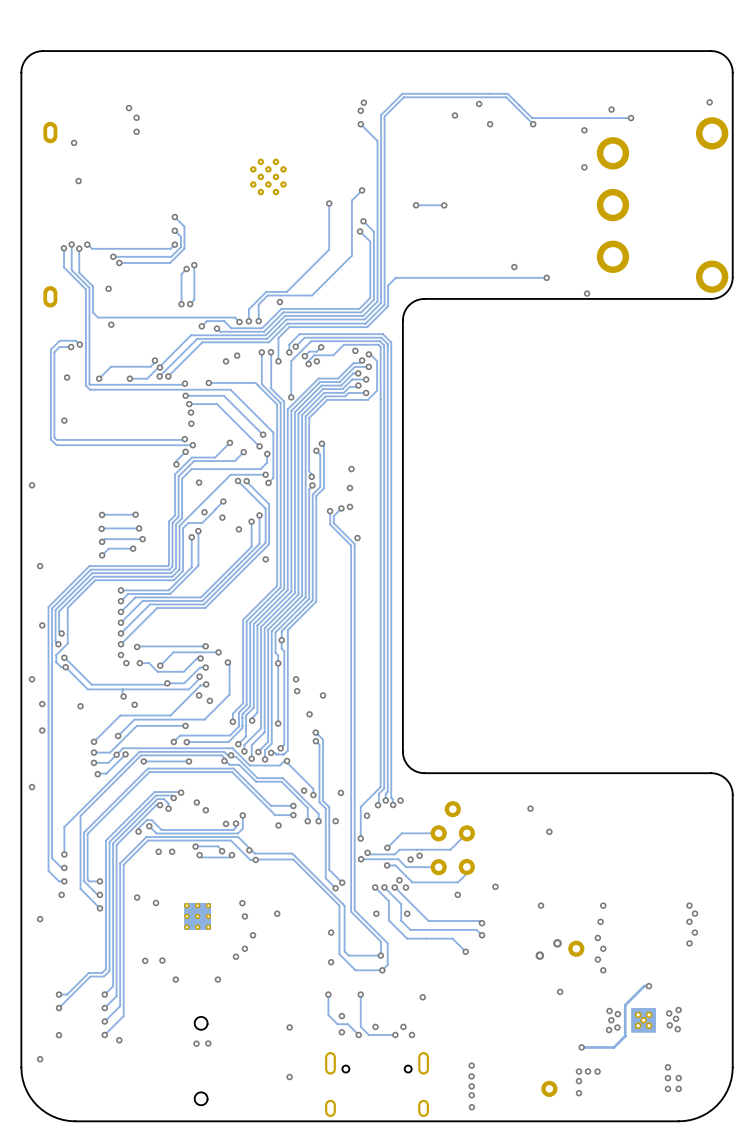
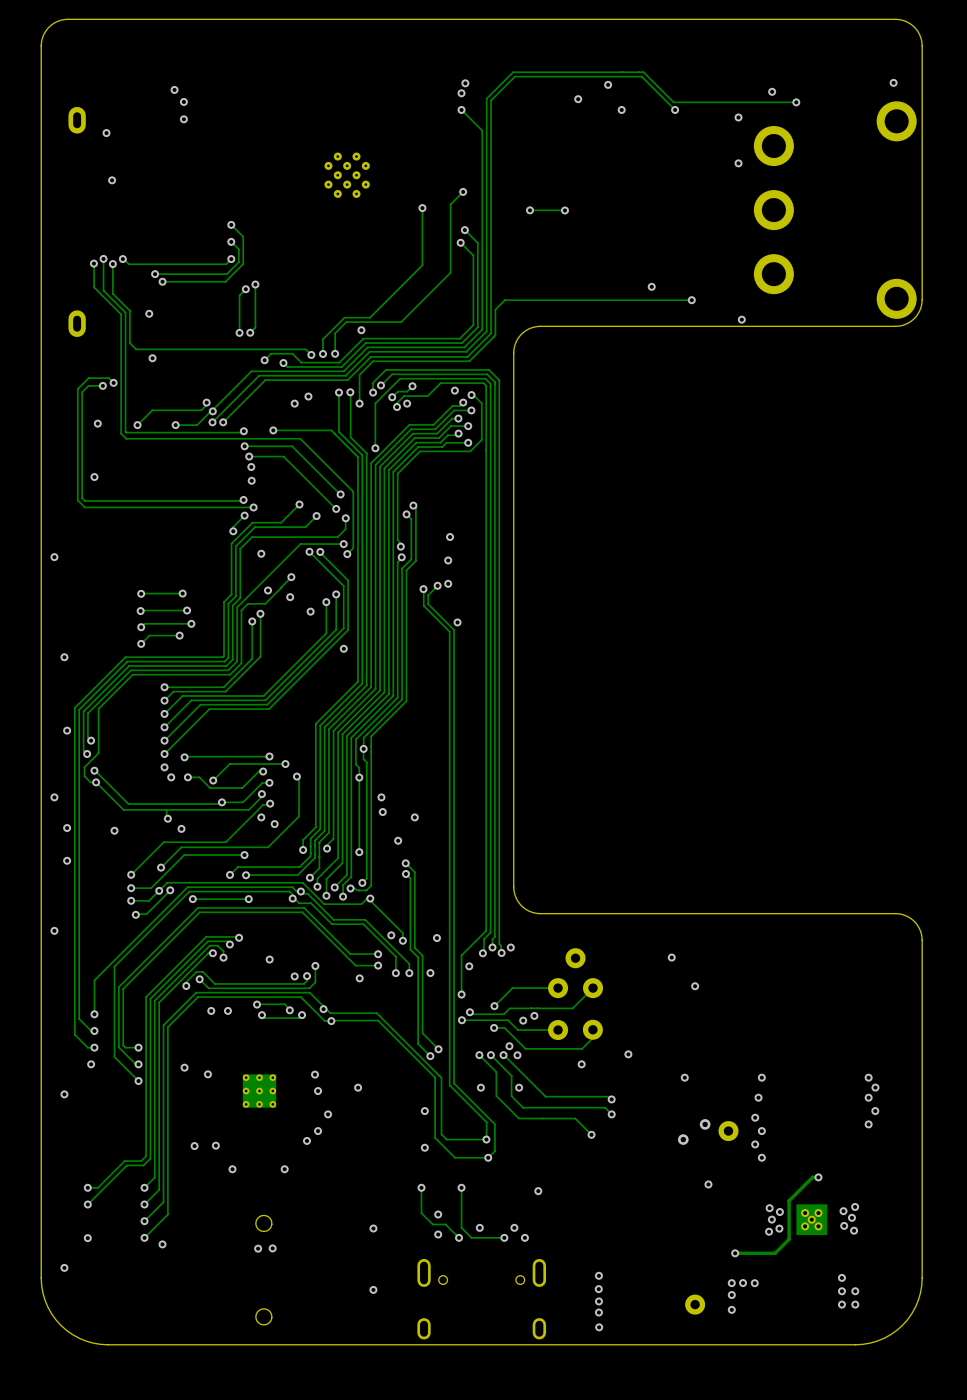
via: (196, 802) -> none

